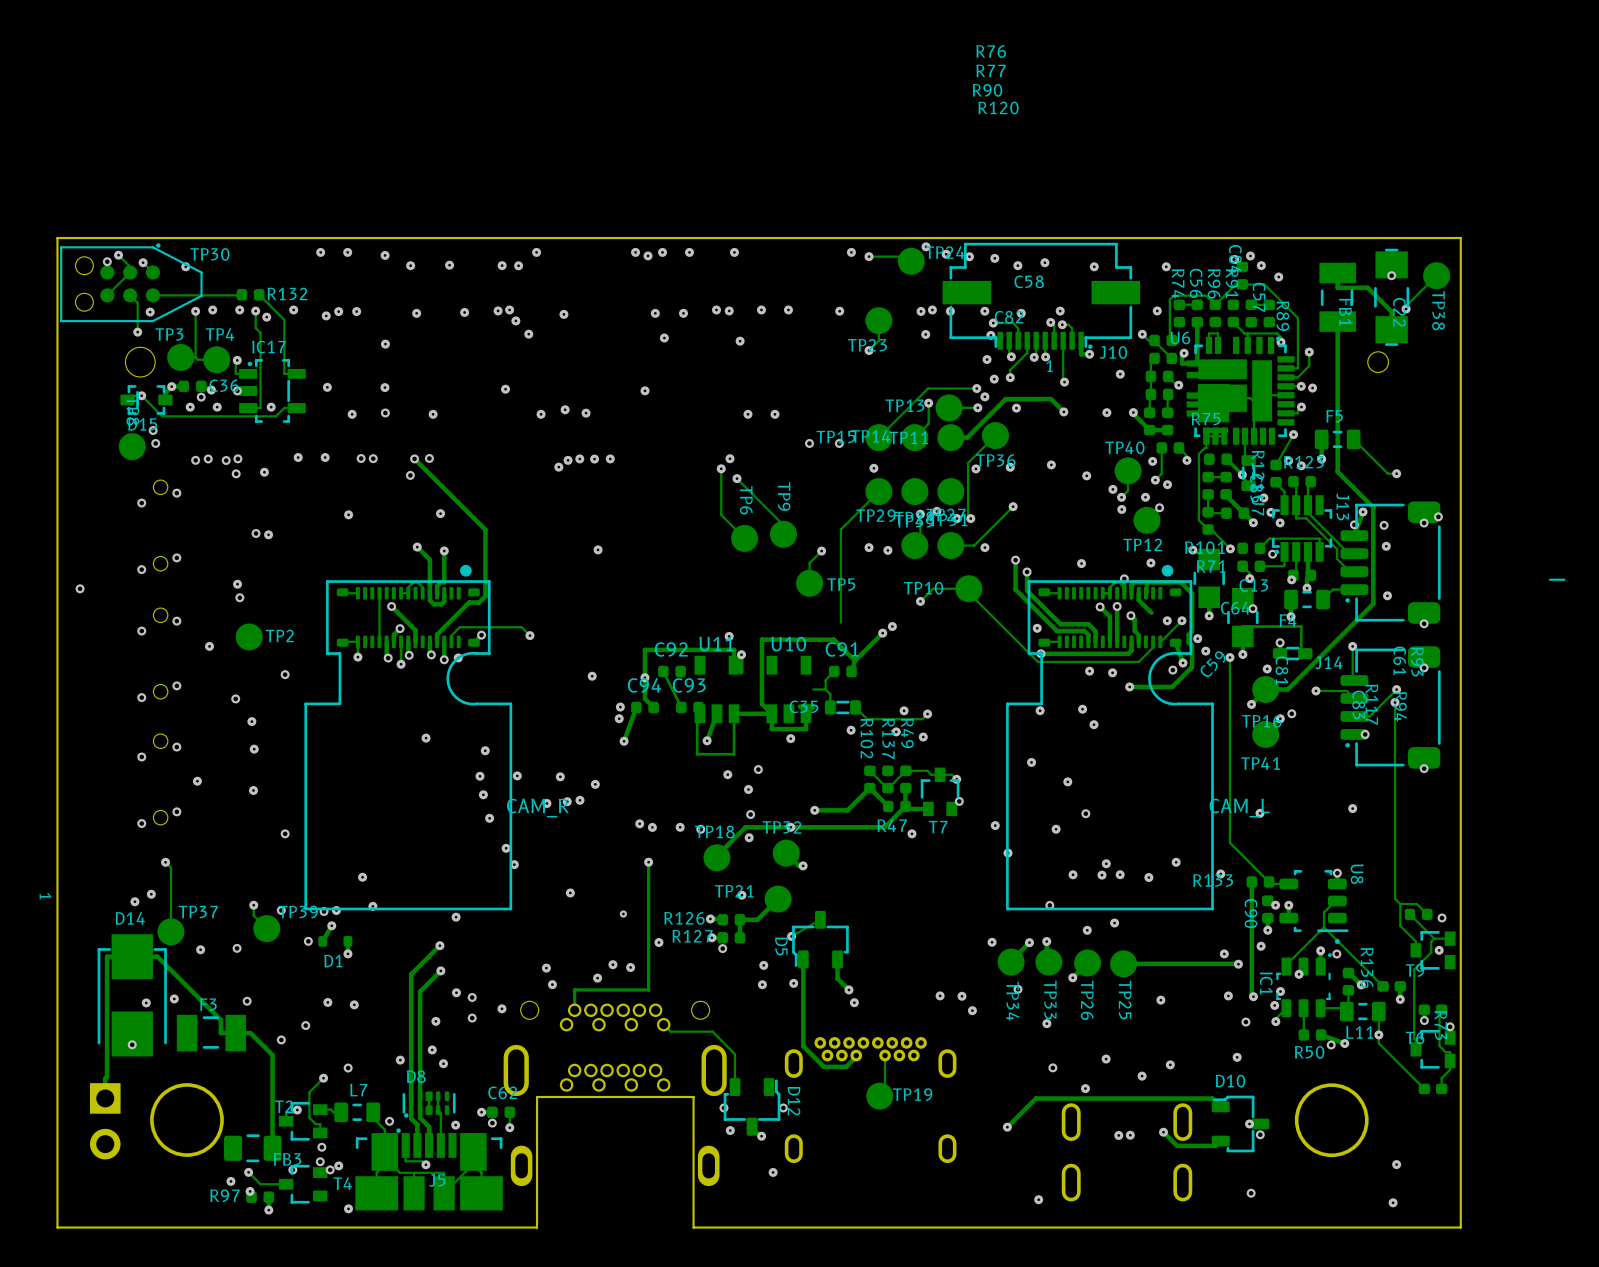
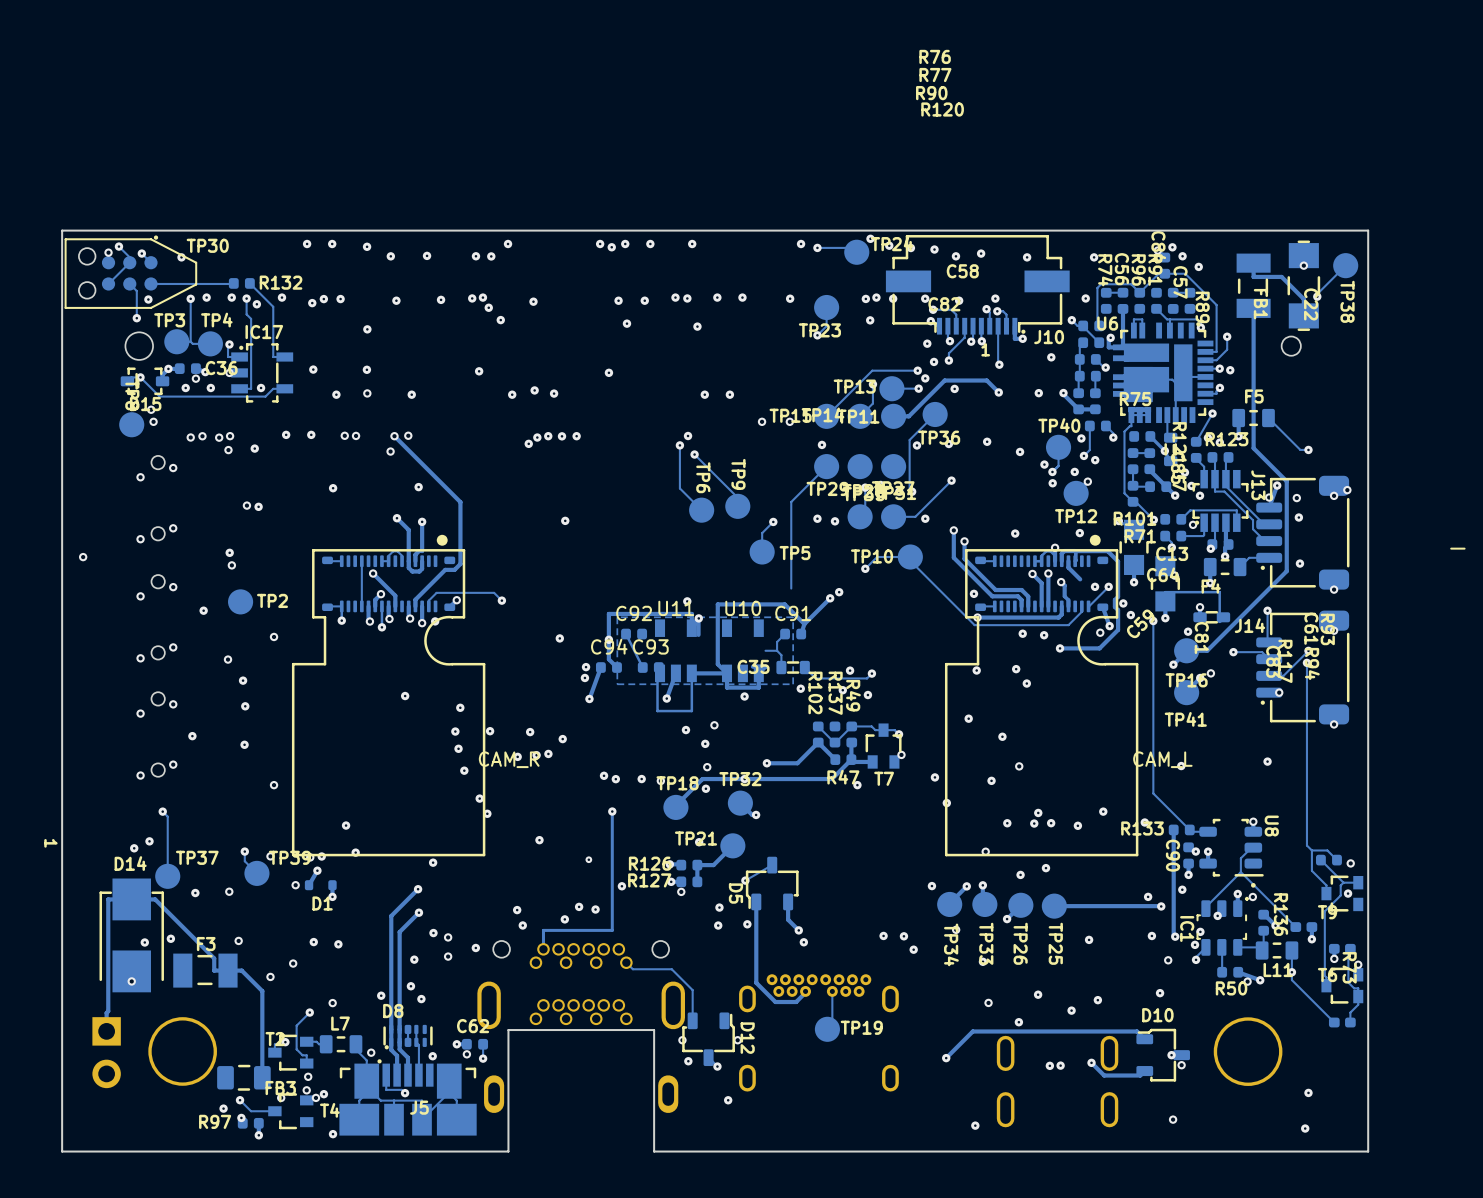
zone outline: none -> (793, 617) (617, 617) (617, 684) (793, 684) (793, 617)

